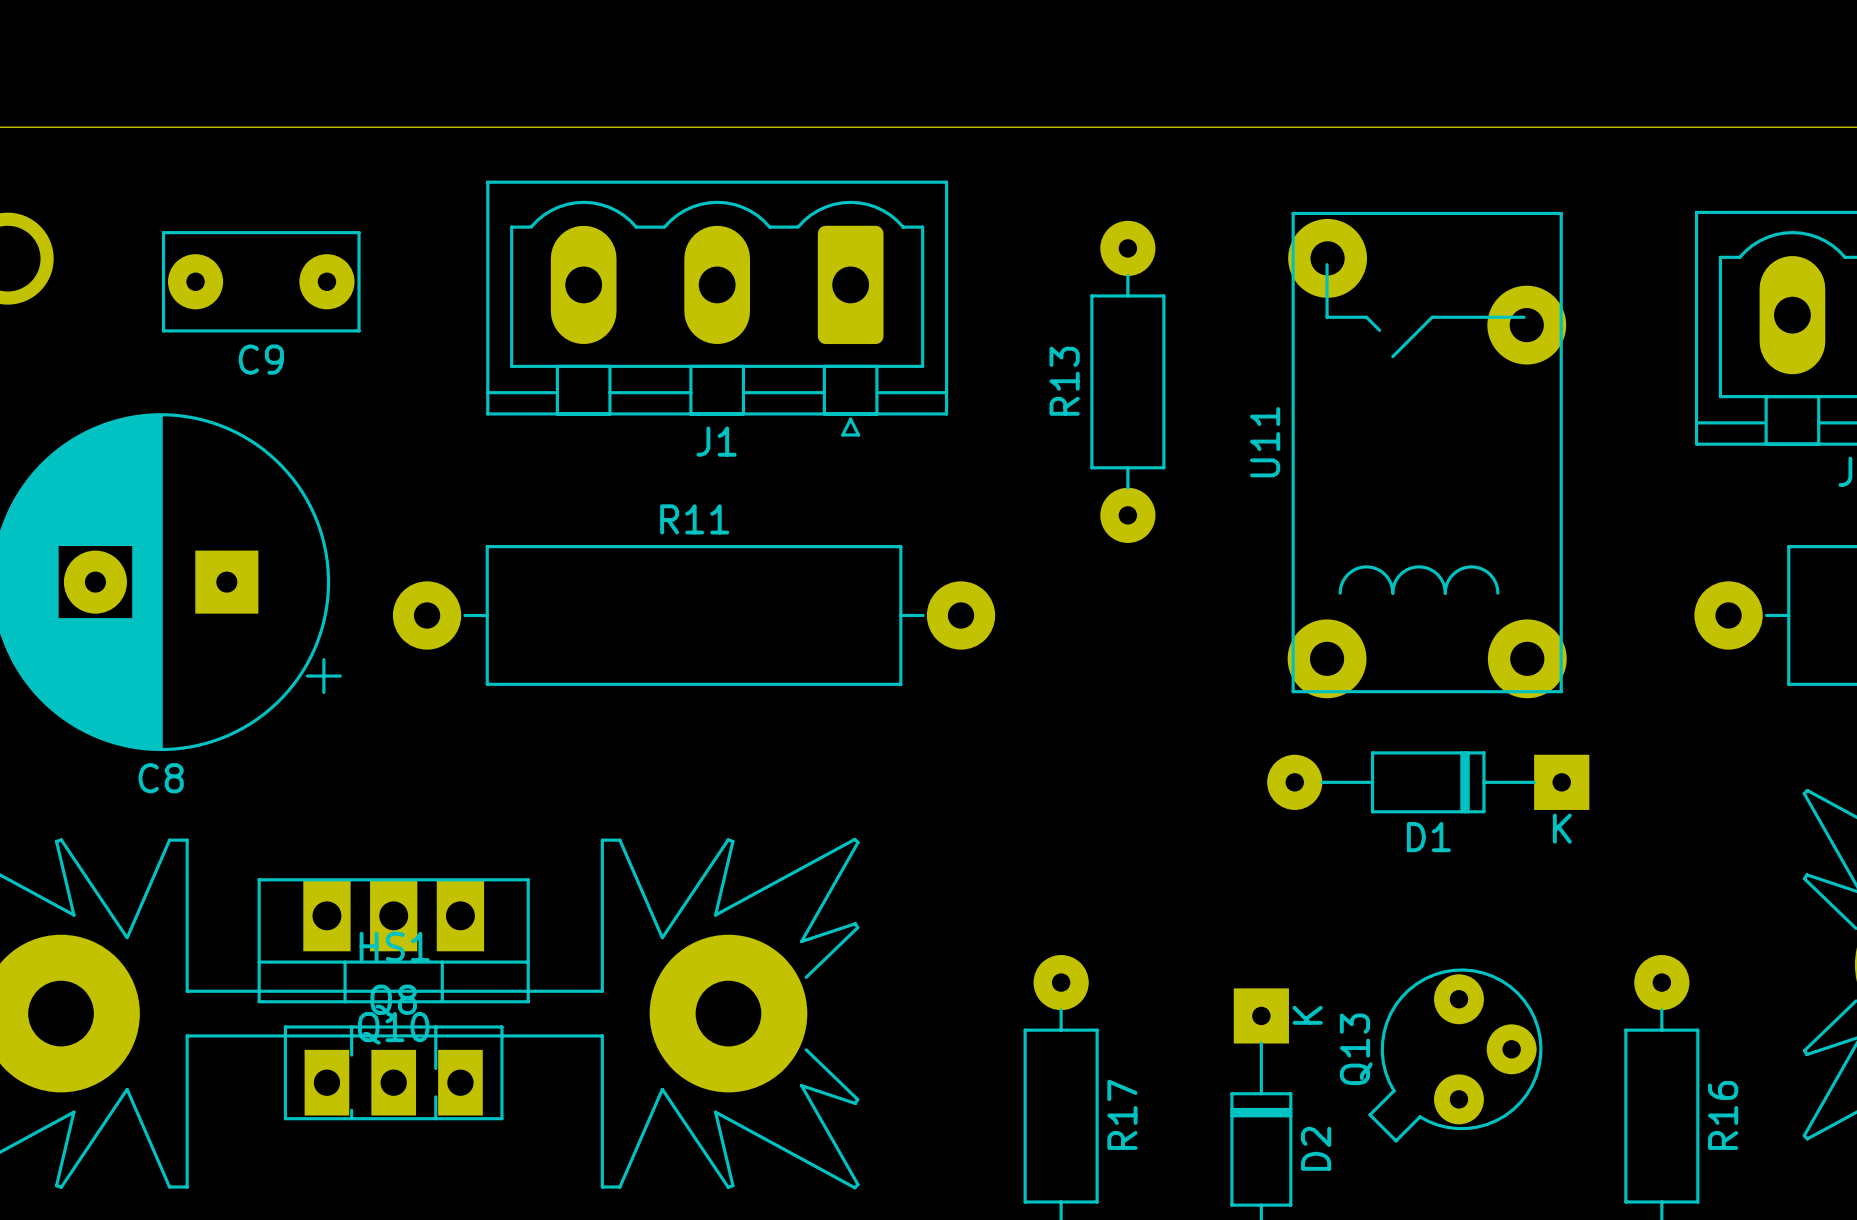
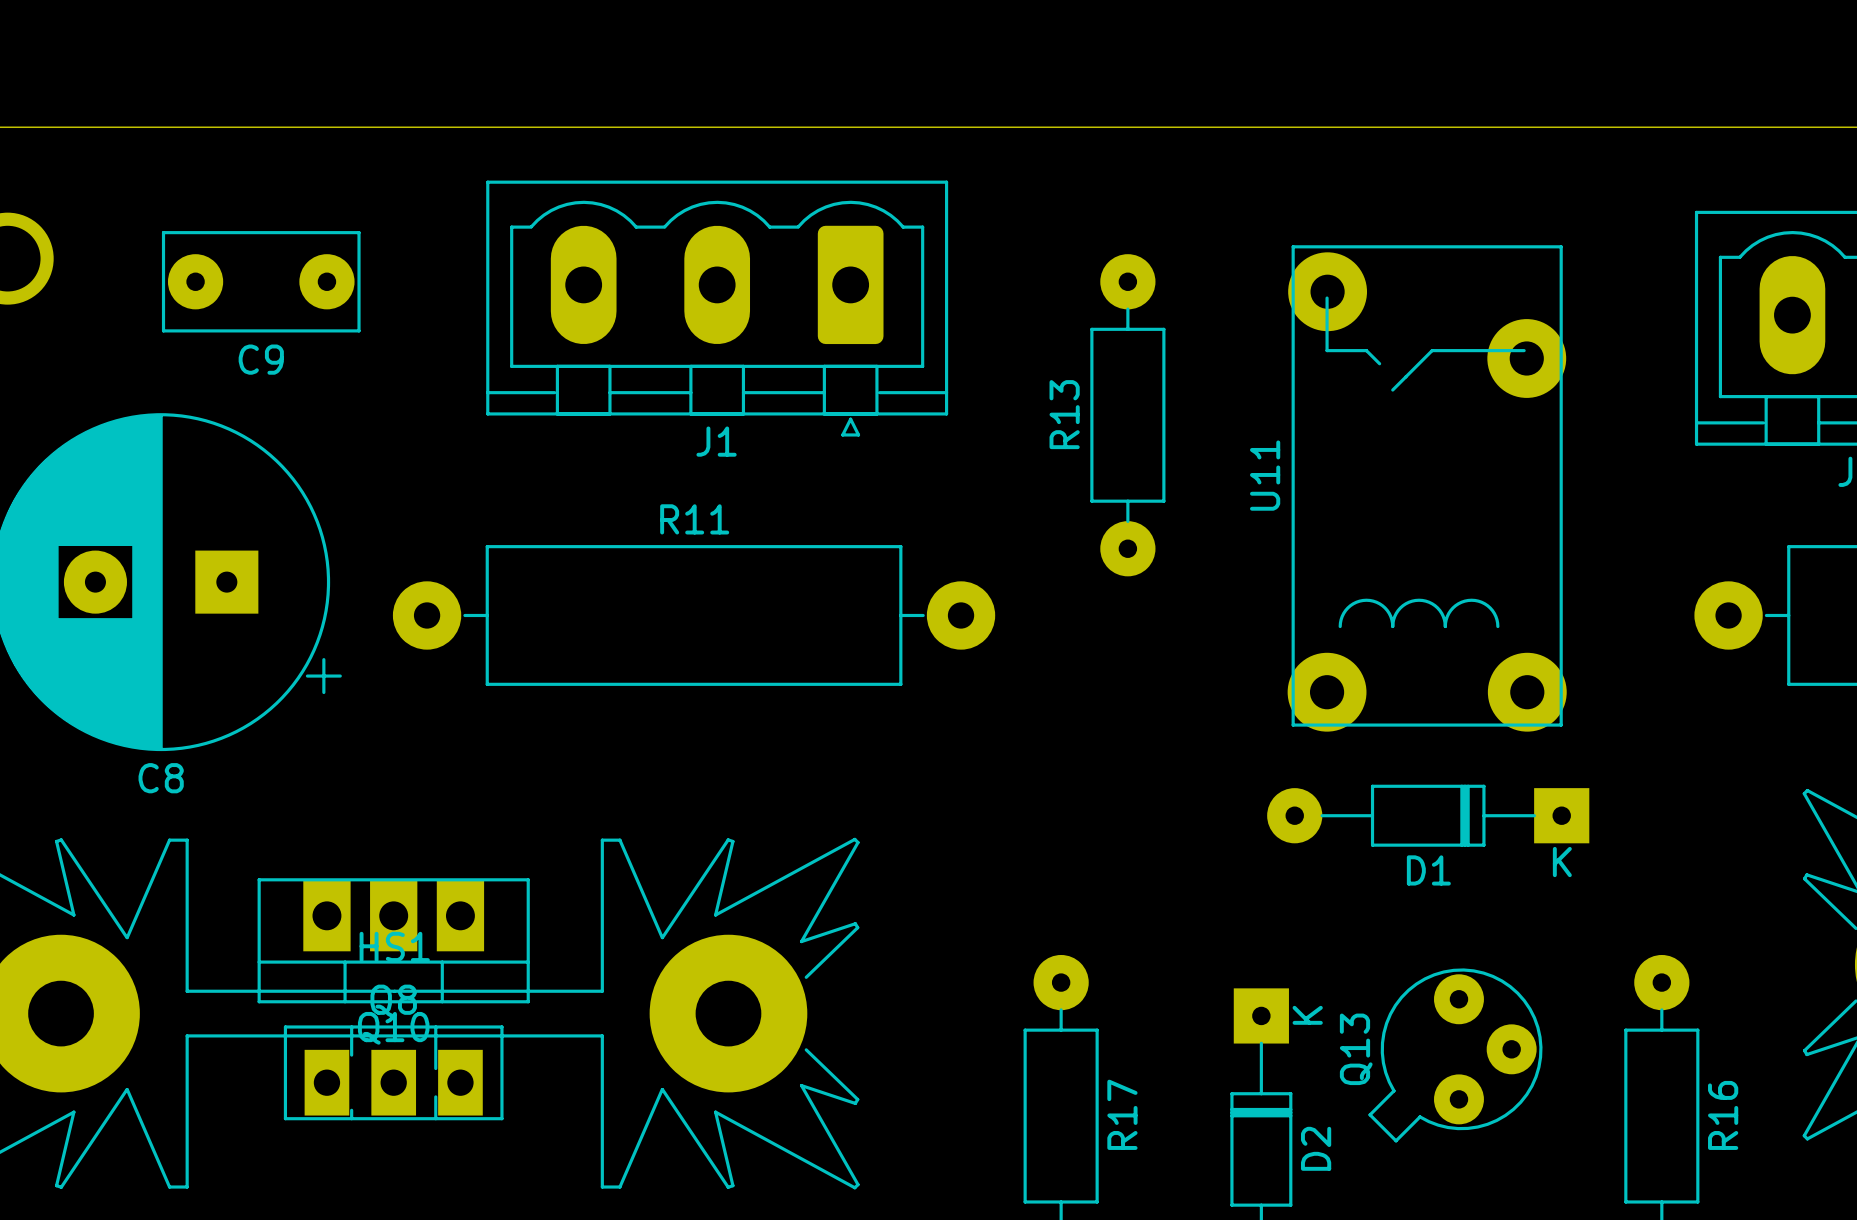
R13 position: (1127, 381) -> (1127, 415)
U11 position: (1427, 455) -> (1427, 488)
D1 position: (1428, 782) -> (1428, 815)

